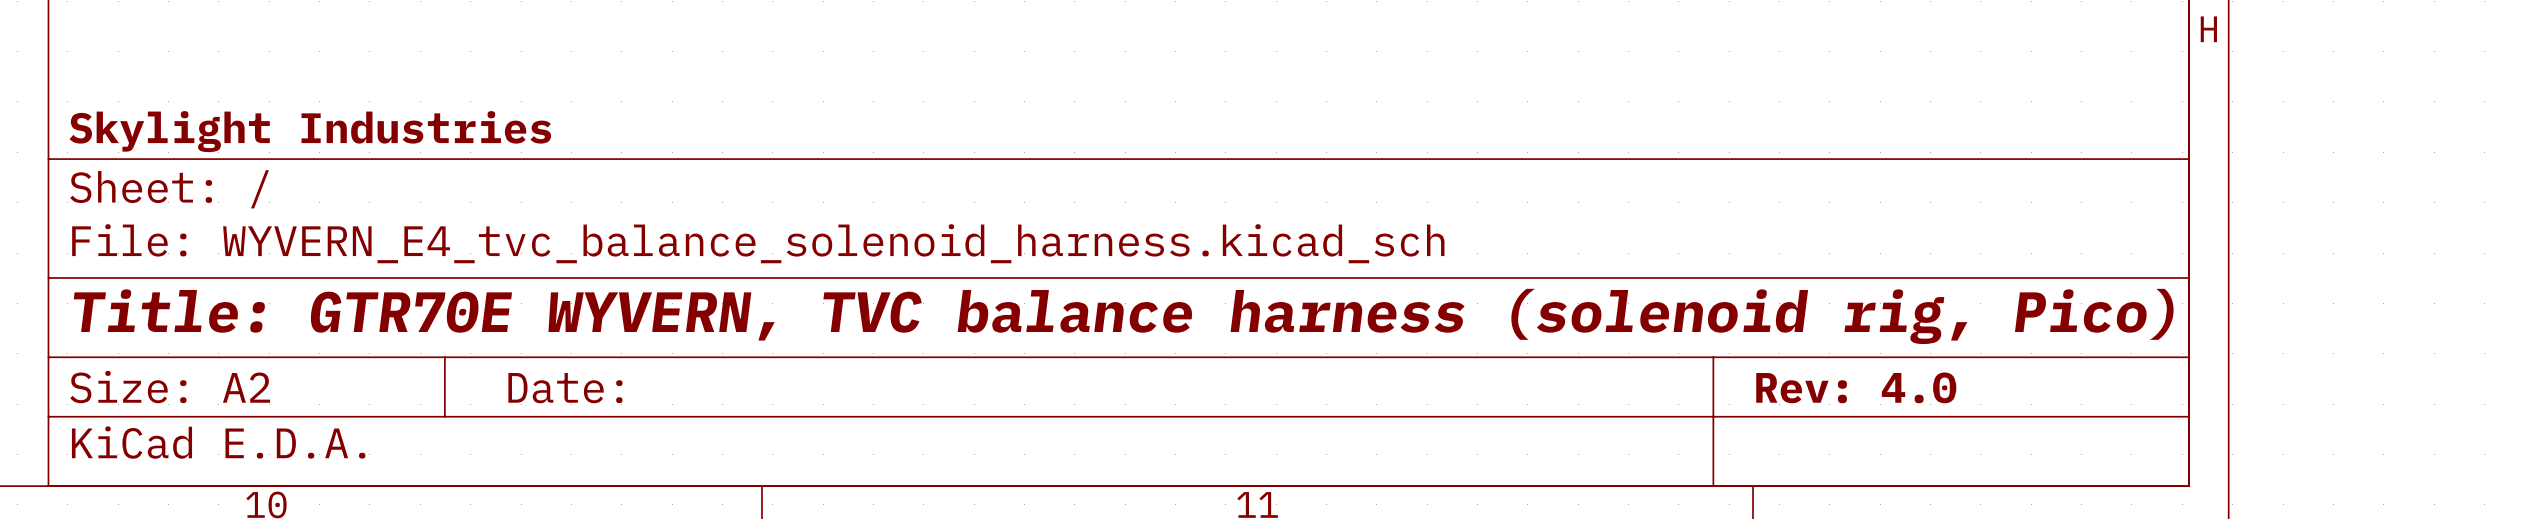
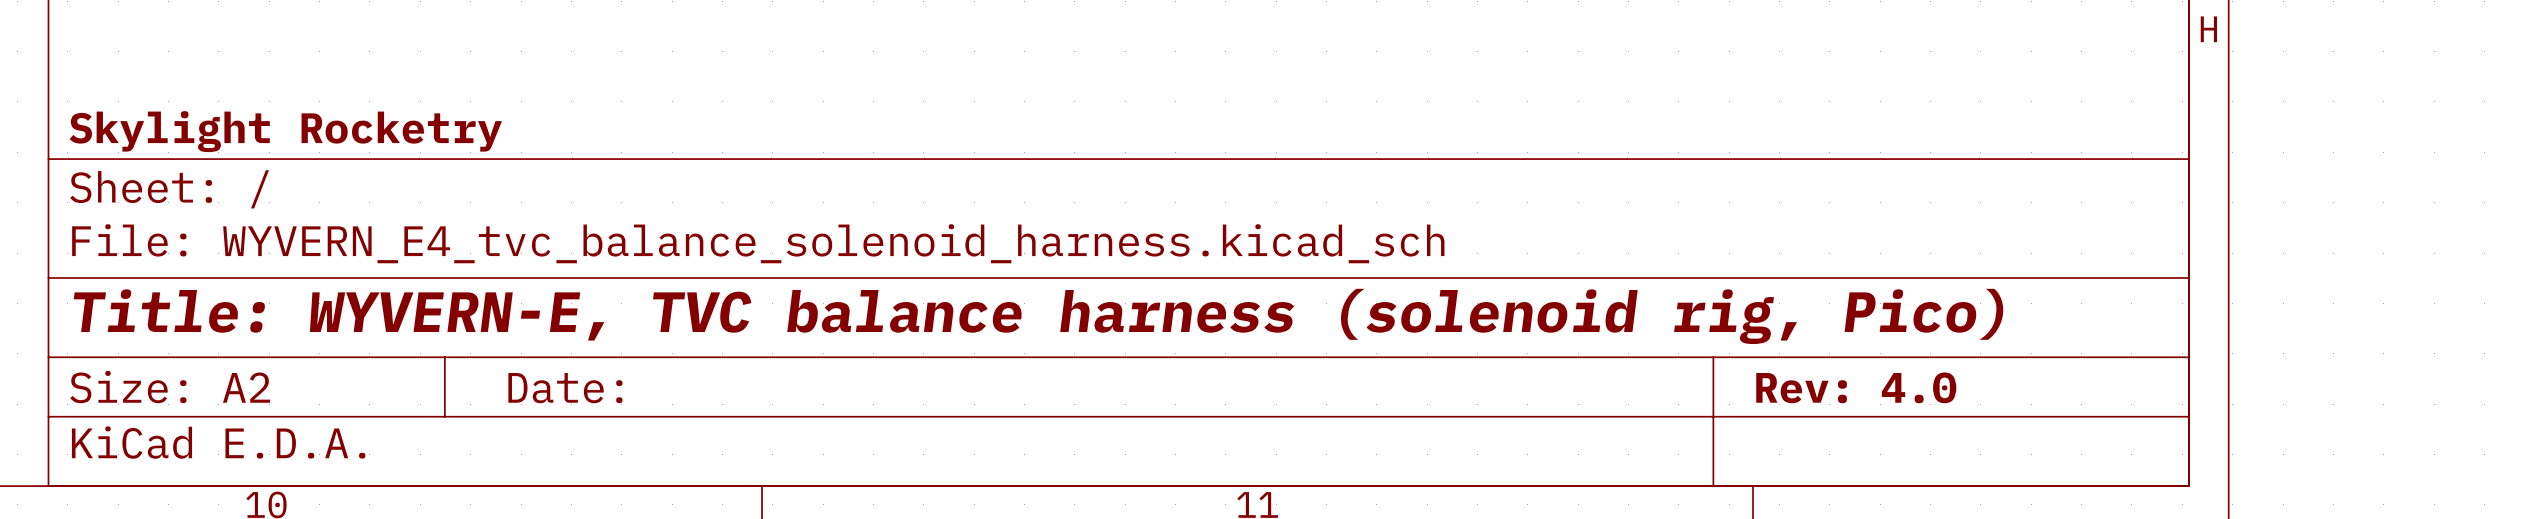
title block: Skylight Industries (310, 131) -> Skylight Rocketry (285, 131)
title block: Title: GTR70E WYVERN, TVC balance harness (solenoid rig, Pico) (1123, 316) -> Title: WYVERN-E, TVC balance harness (solenoid rig, Pico) (1038, 316)

